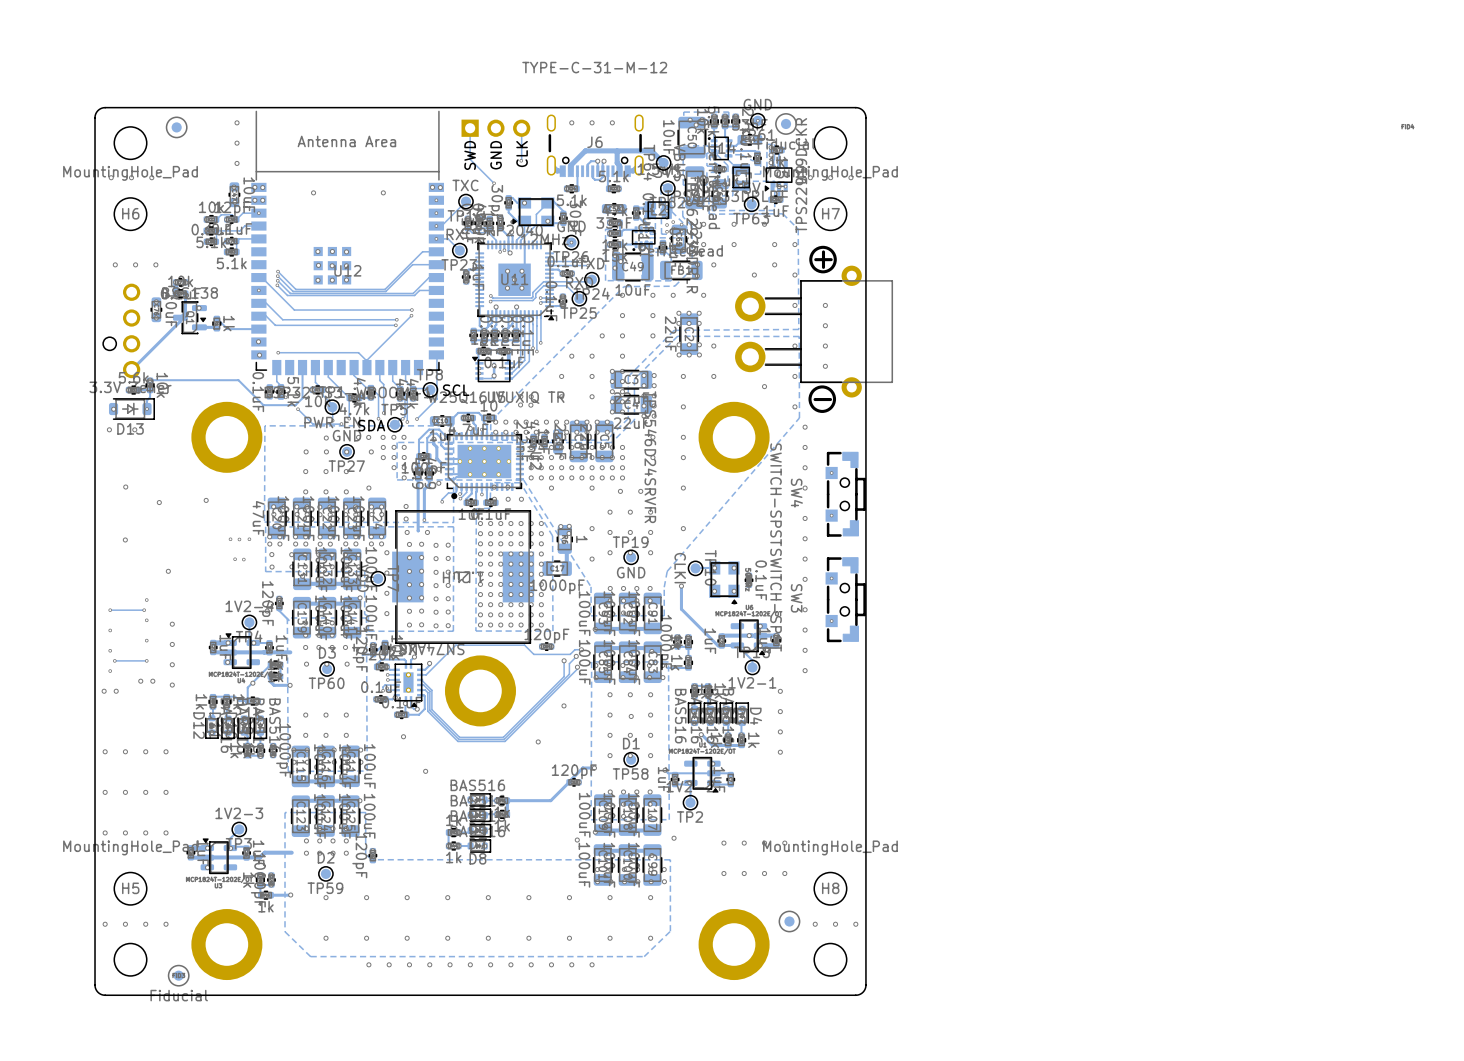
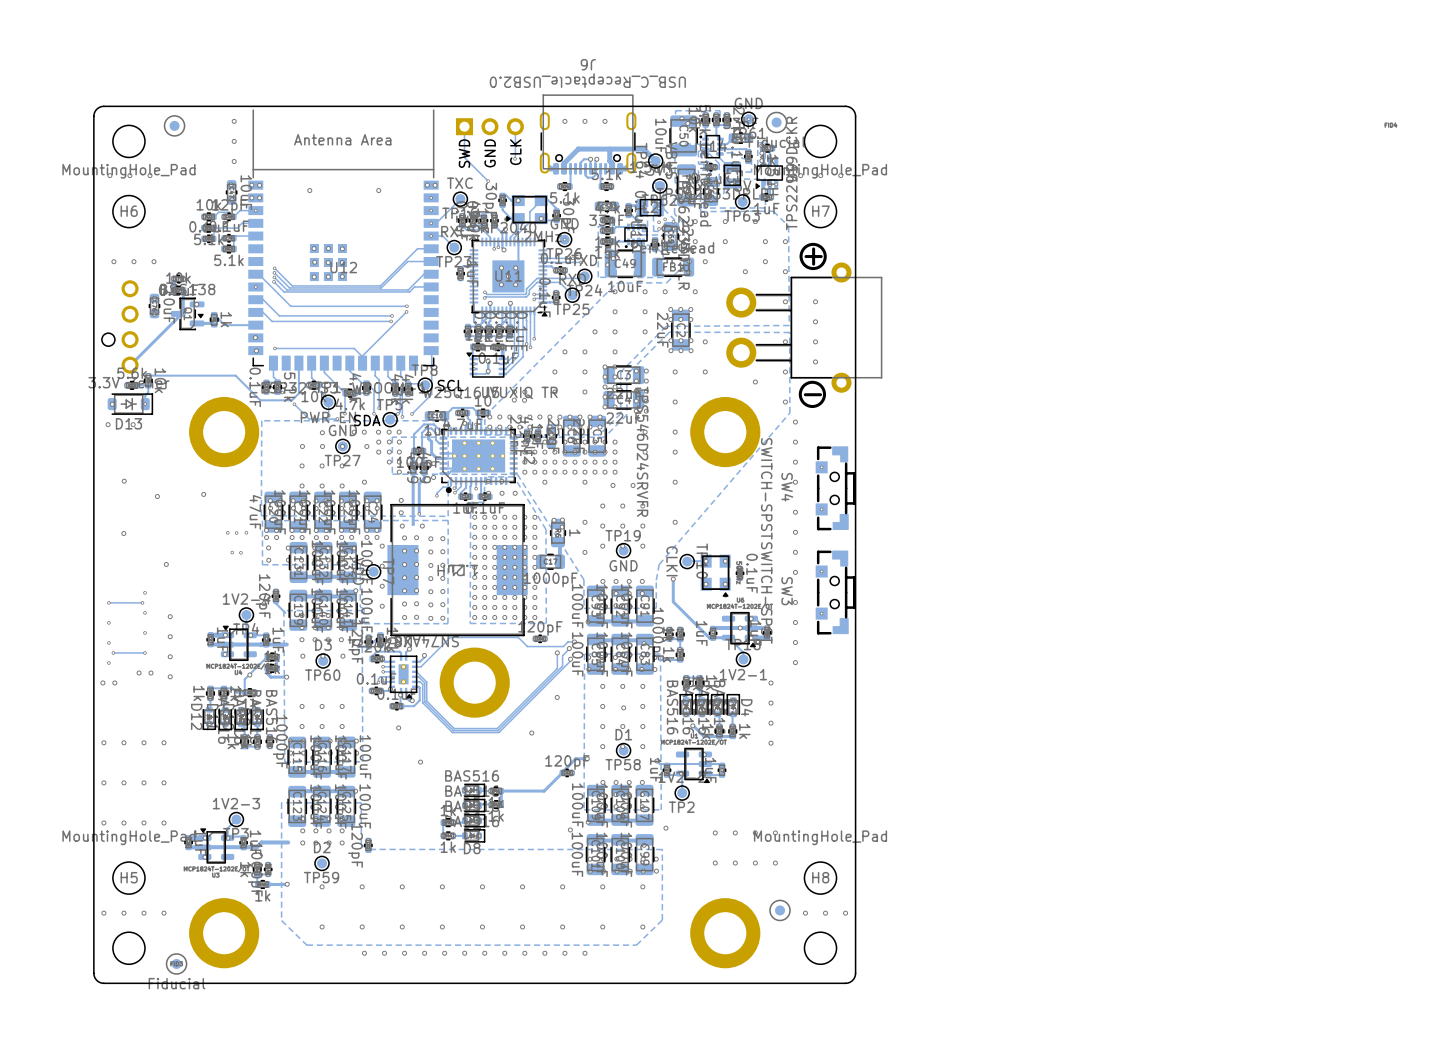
J6 value: TYPE-C-31-M-12 (594, 67) -> USB_C_Receptacle_USB2.0 (587, 80)
J6 footprint: [546, 114, 644, 178] -> [539, 94, 637, 175]
J6 name position: J6 (594, 142) -> J6 (588, 64)

